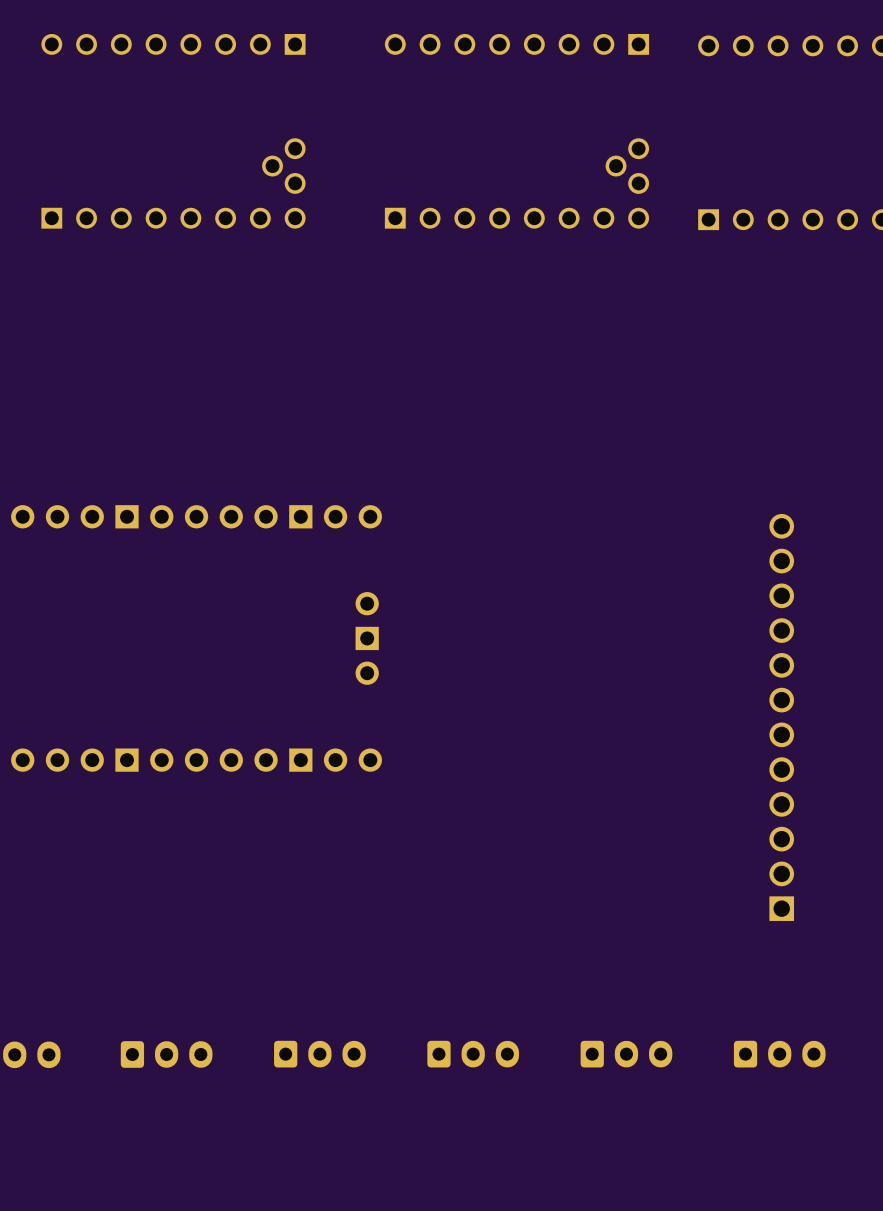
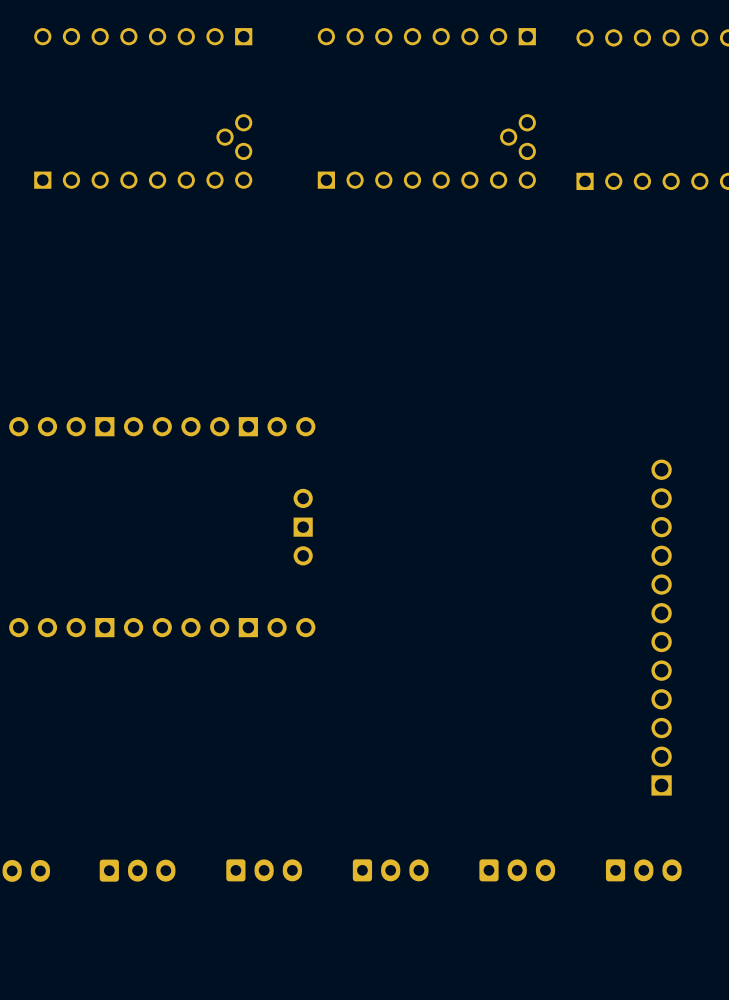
part position: (781, 717) -> (661, 627)

